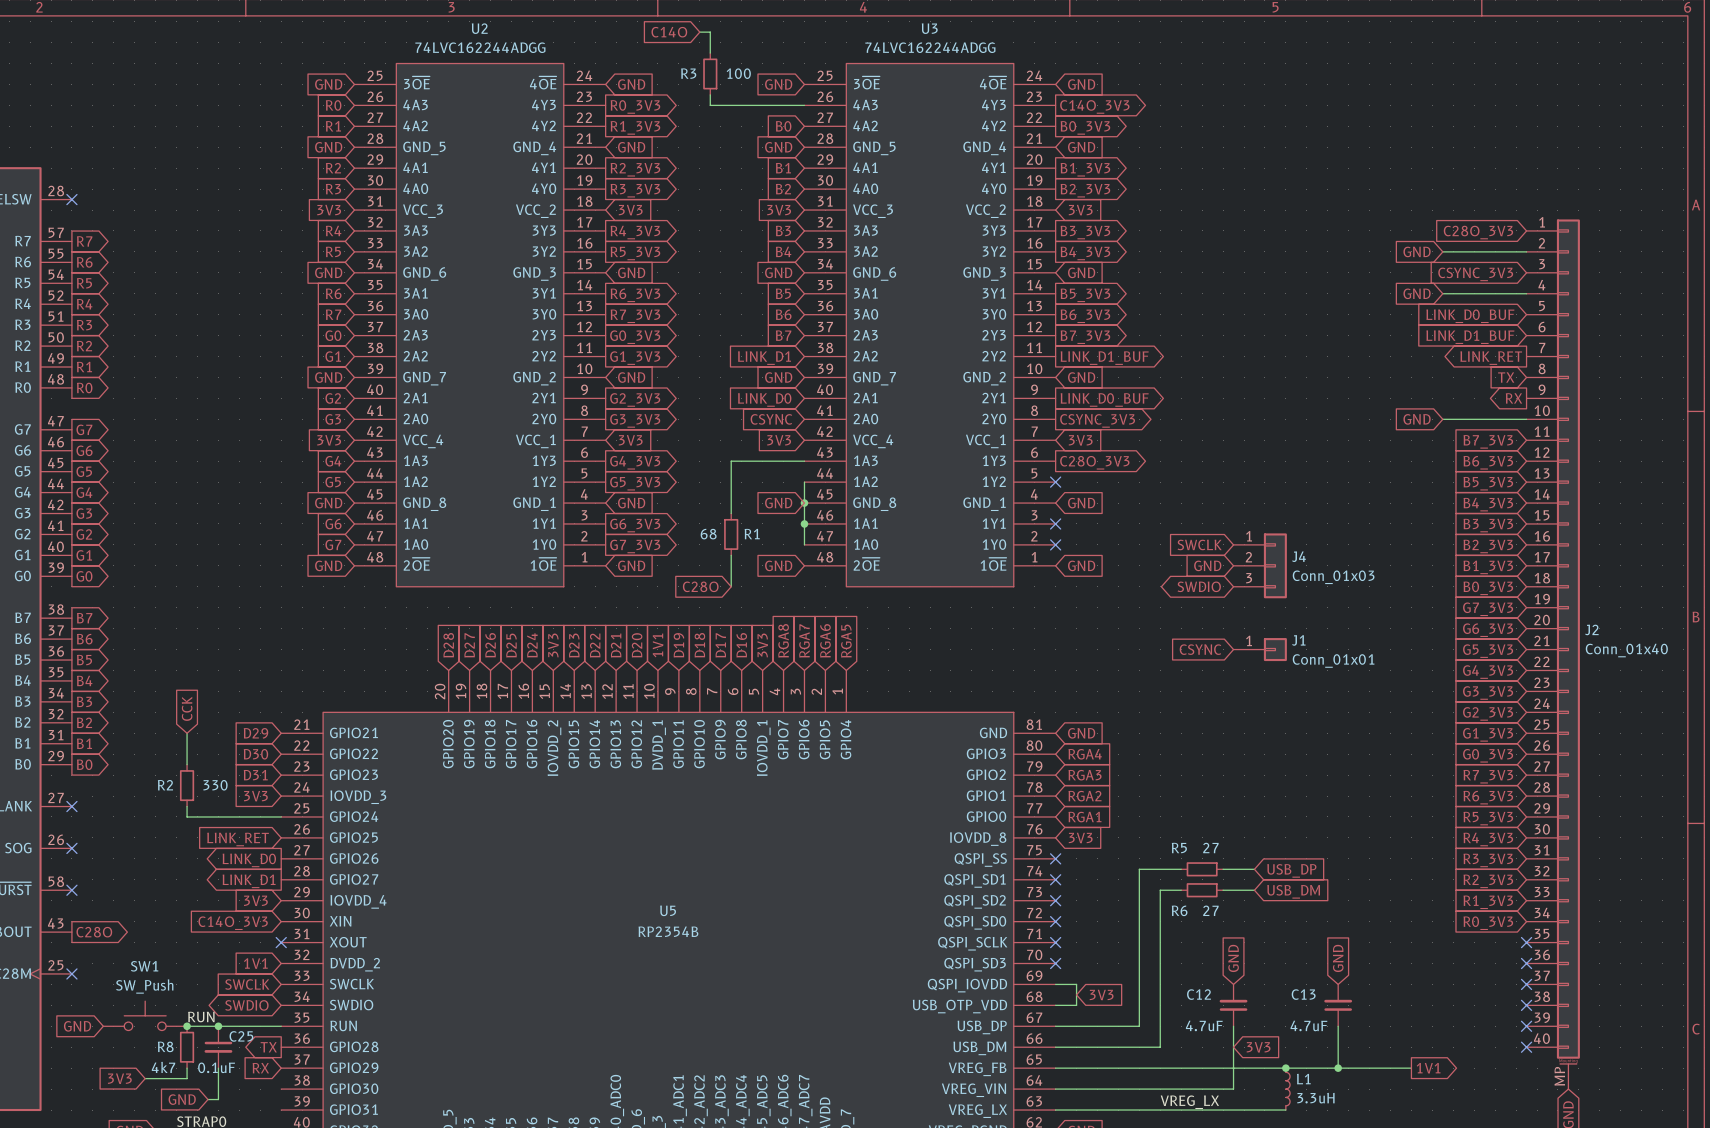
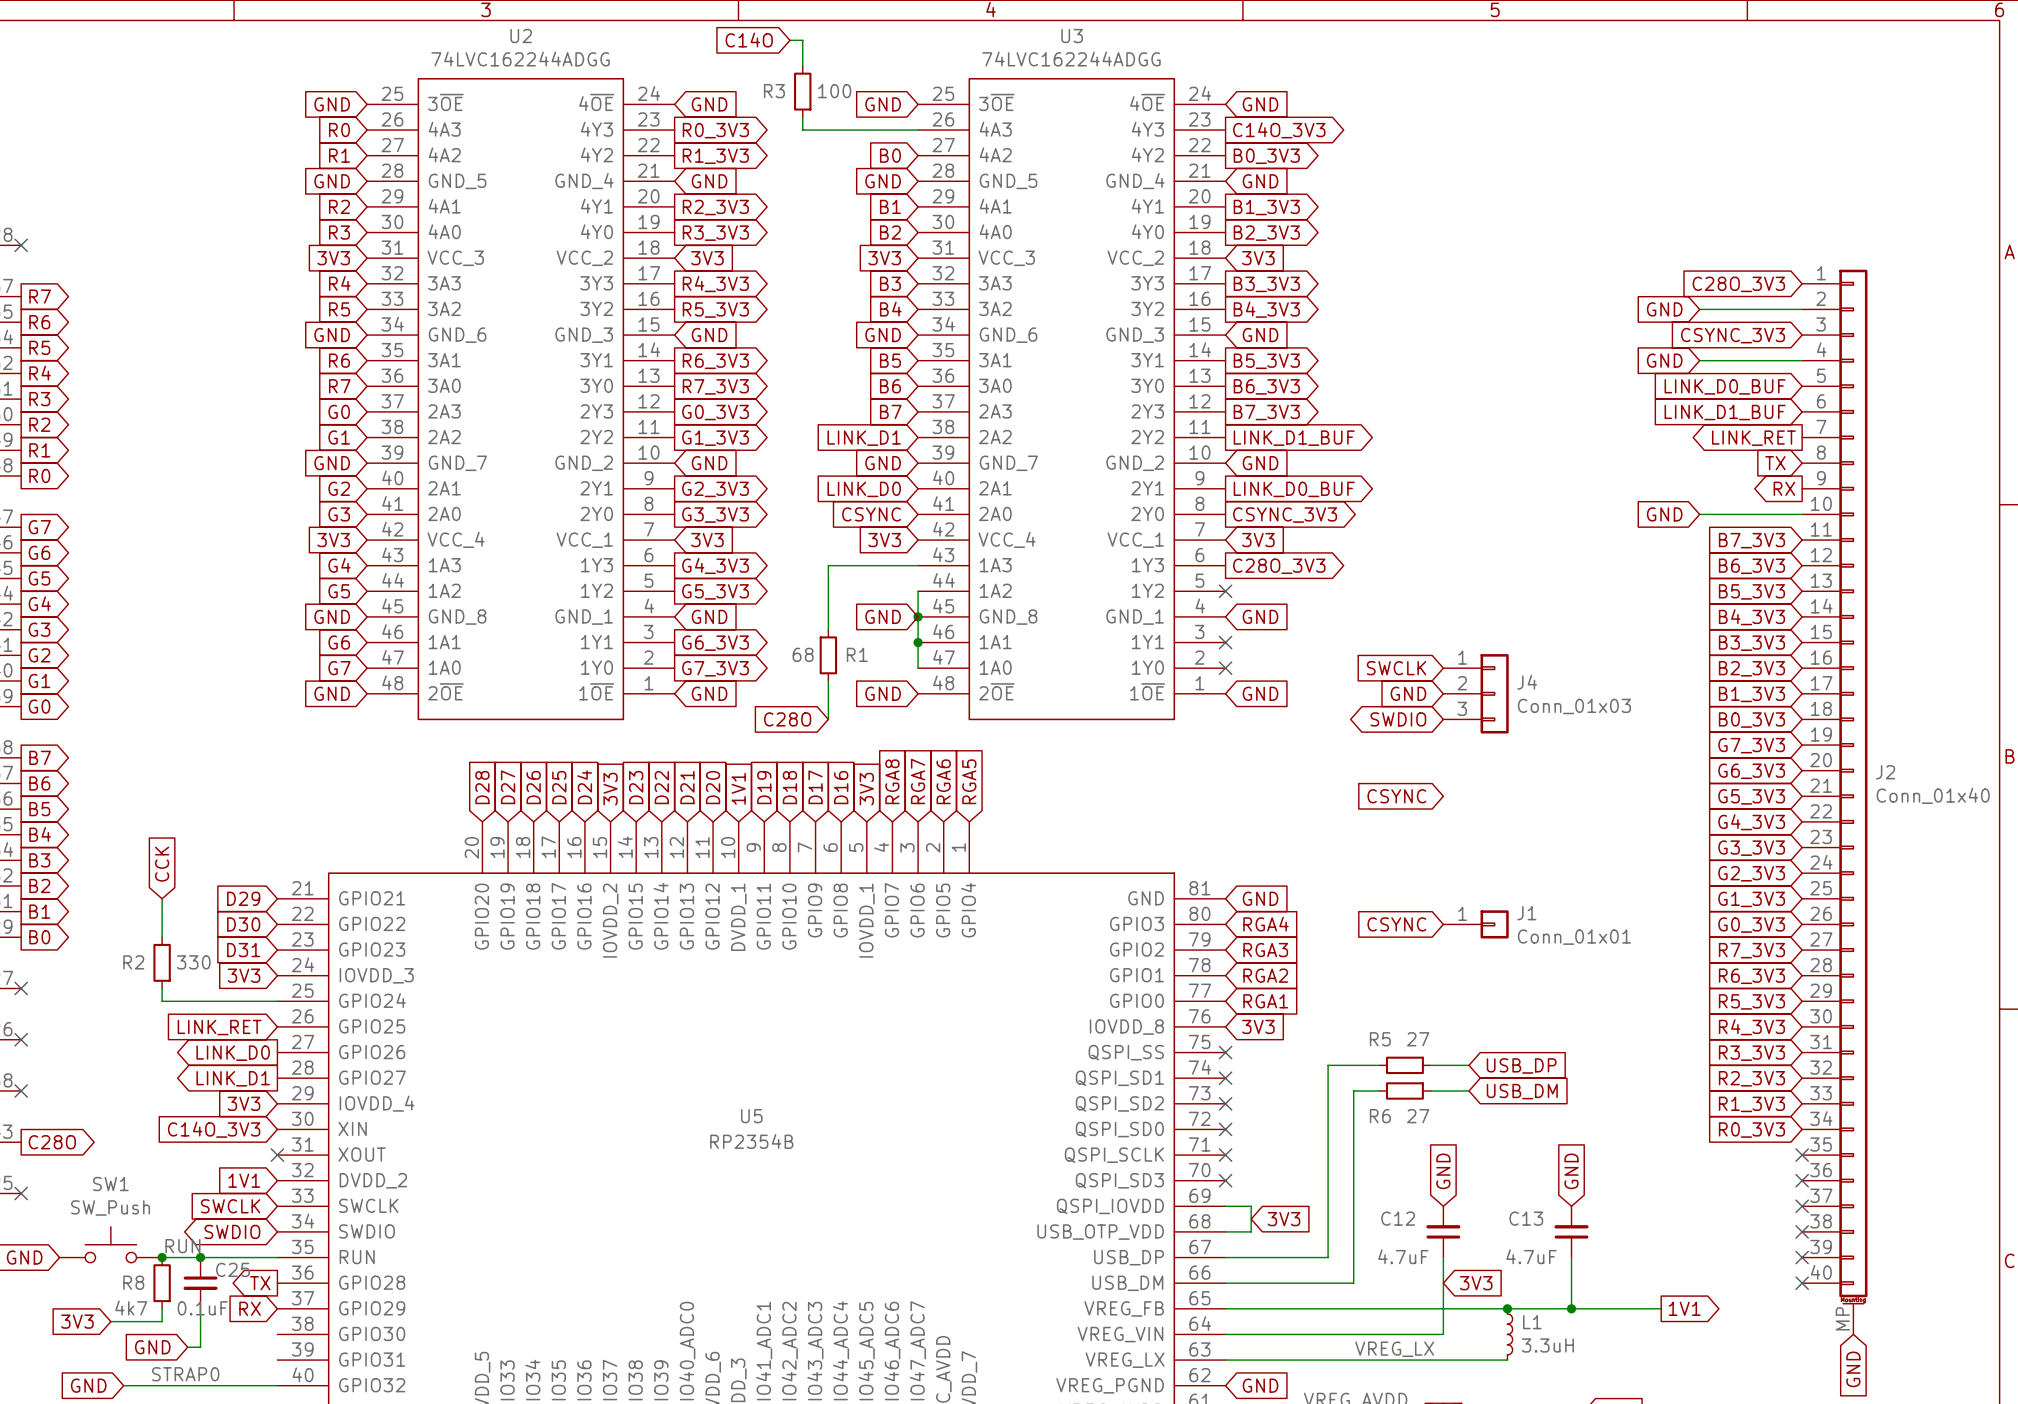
J1 position: (1260, 649) -> (1476, 924)
global label: none -> CSYNC (1396, 924)

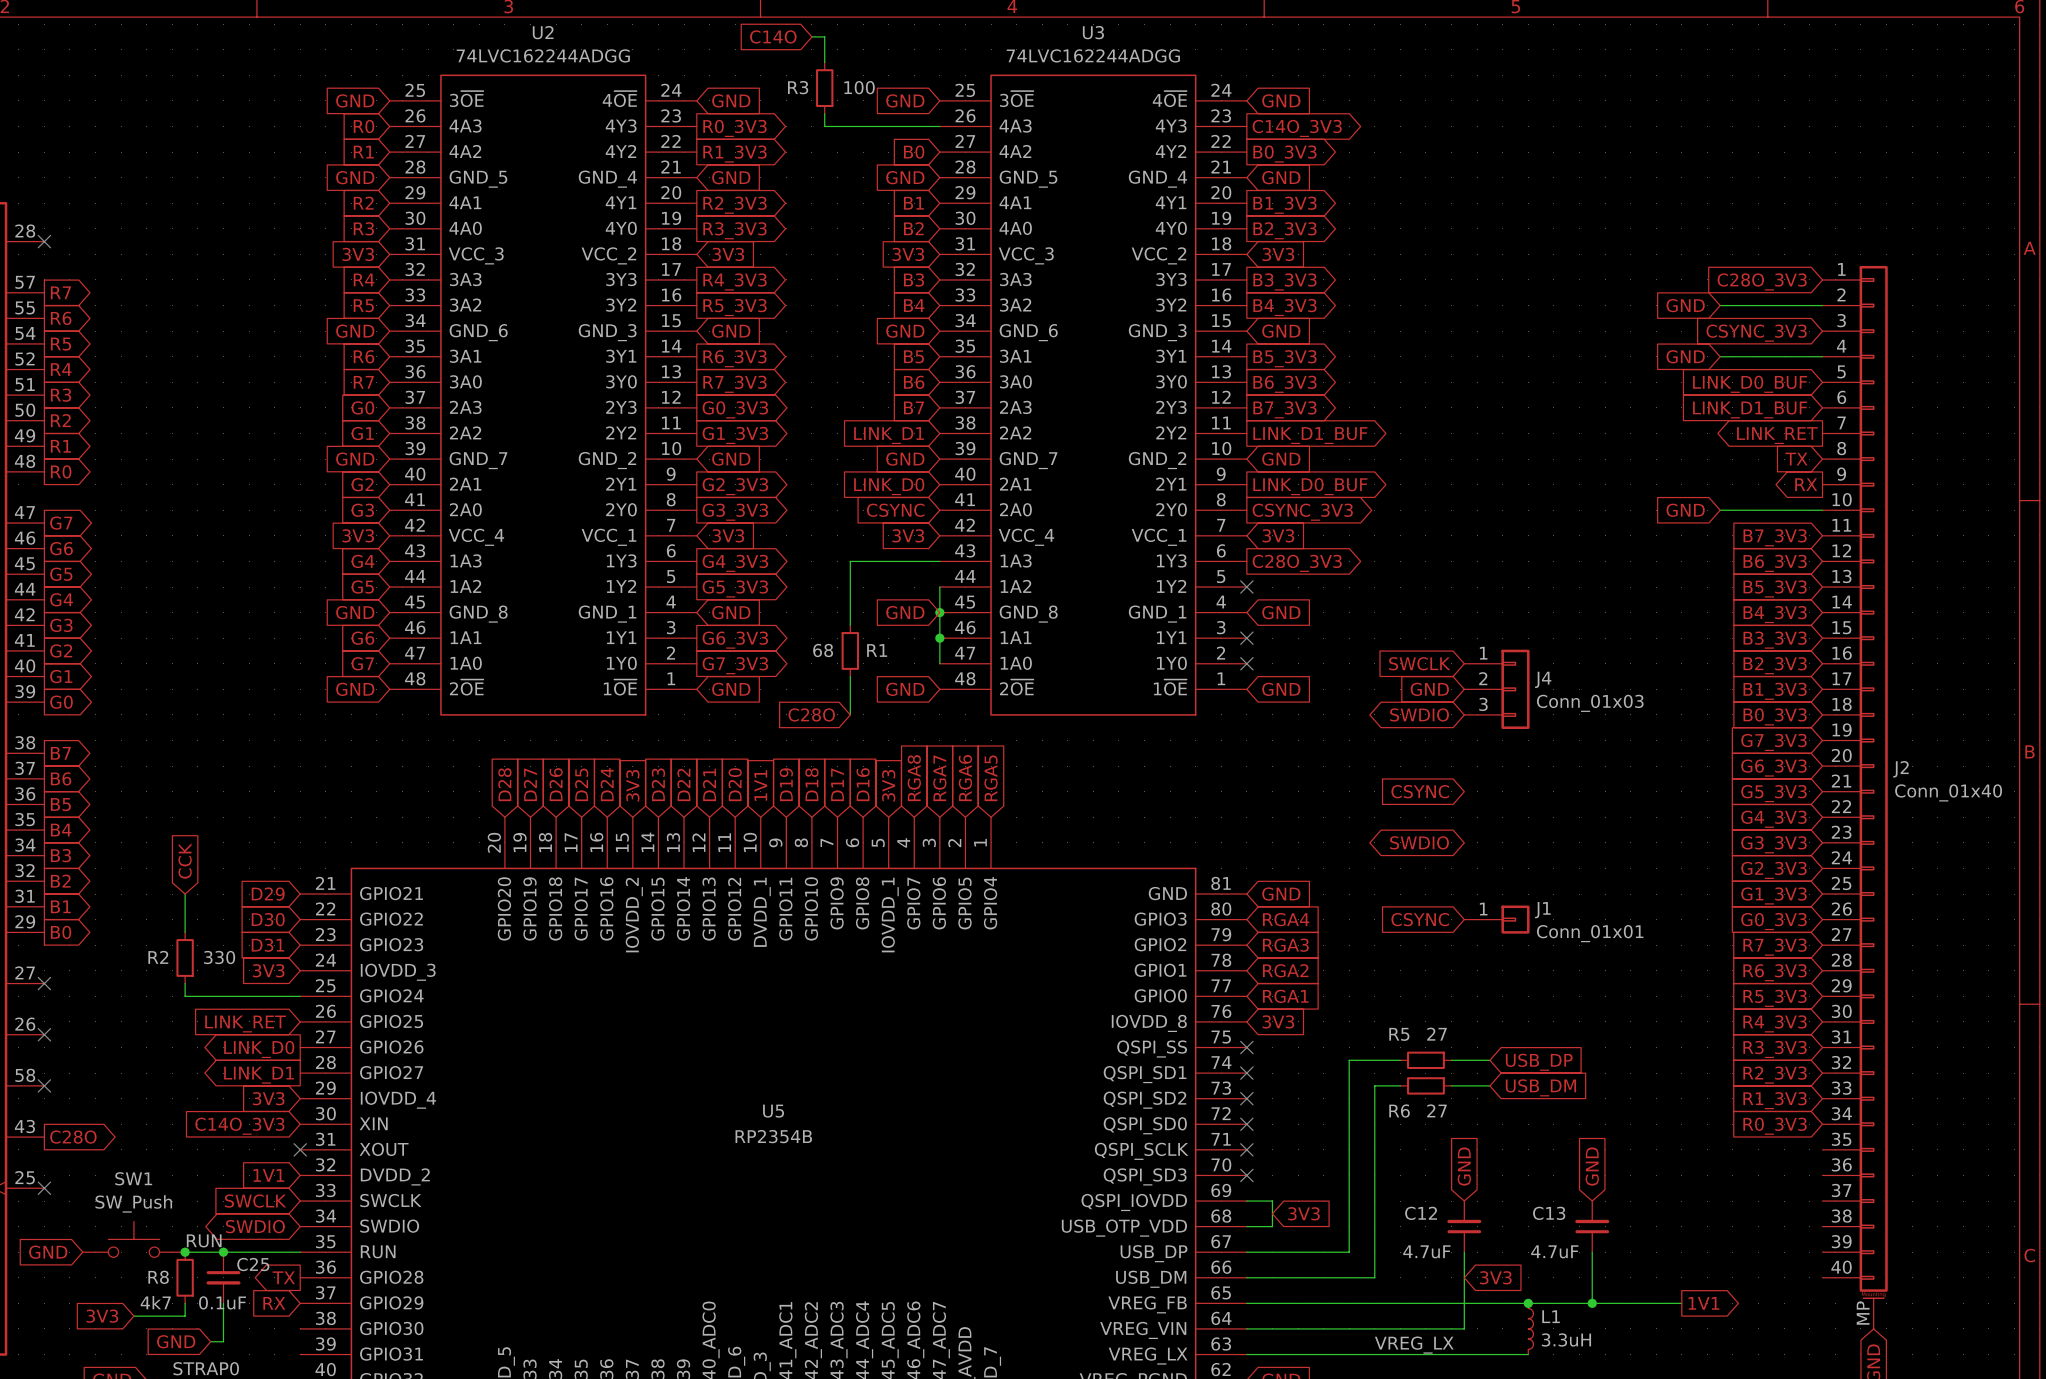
global label: none -> SWDIO (1419, 842)
no-connect mark: (1802, 1155) -> none
no-connect mark: (1802, 1180) -> none
no-connect mark: (1802, 1206) -> none
no-connect mark: (1802, 1231) -> none
no-connect mark: (1802, 1257) -> none
no-connect mark: (1802, 1283) -> none

